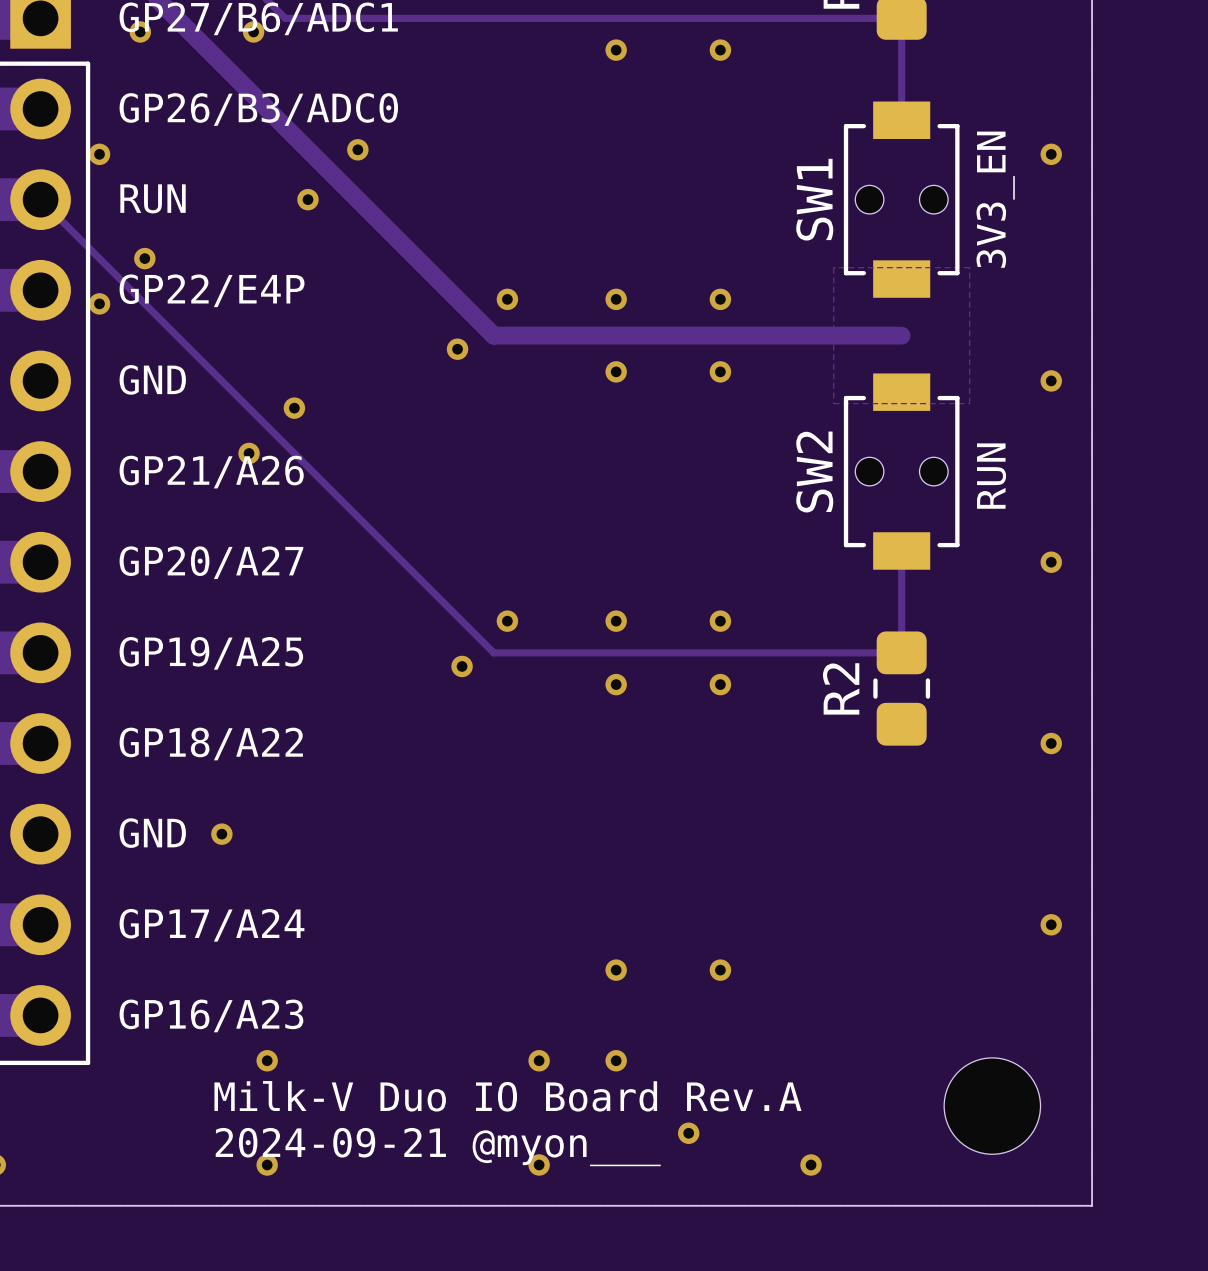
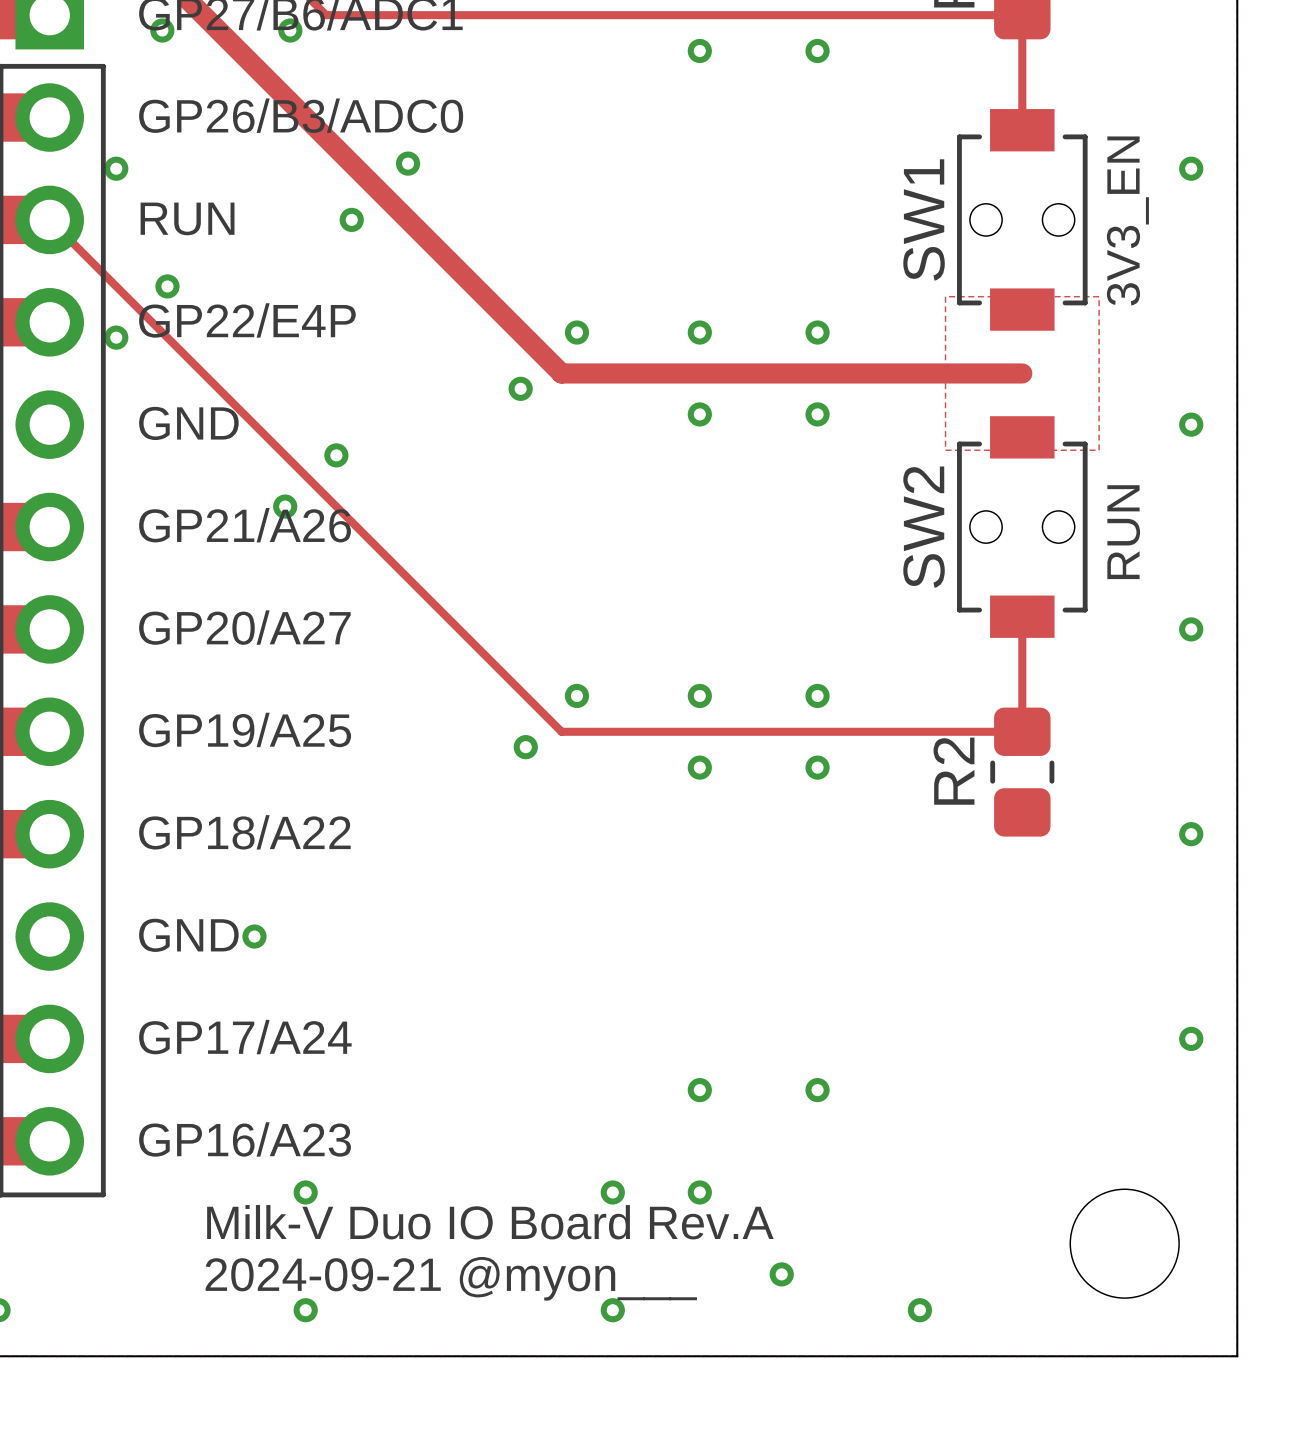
text position: Milk-V Duo IO Board Rev.A (507, 1096) -> Milk-V Duo IO Board Rev.A (490, 1222)
text position: 2024-09-21 @myon___ (438, 1147) -> 2024-09-21 @myon___ (451, 1278)

